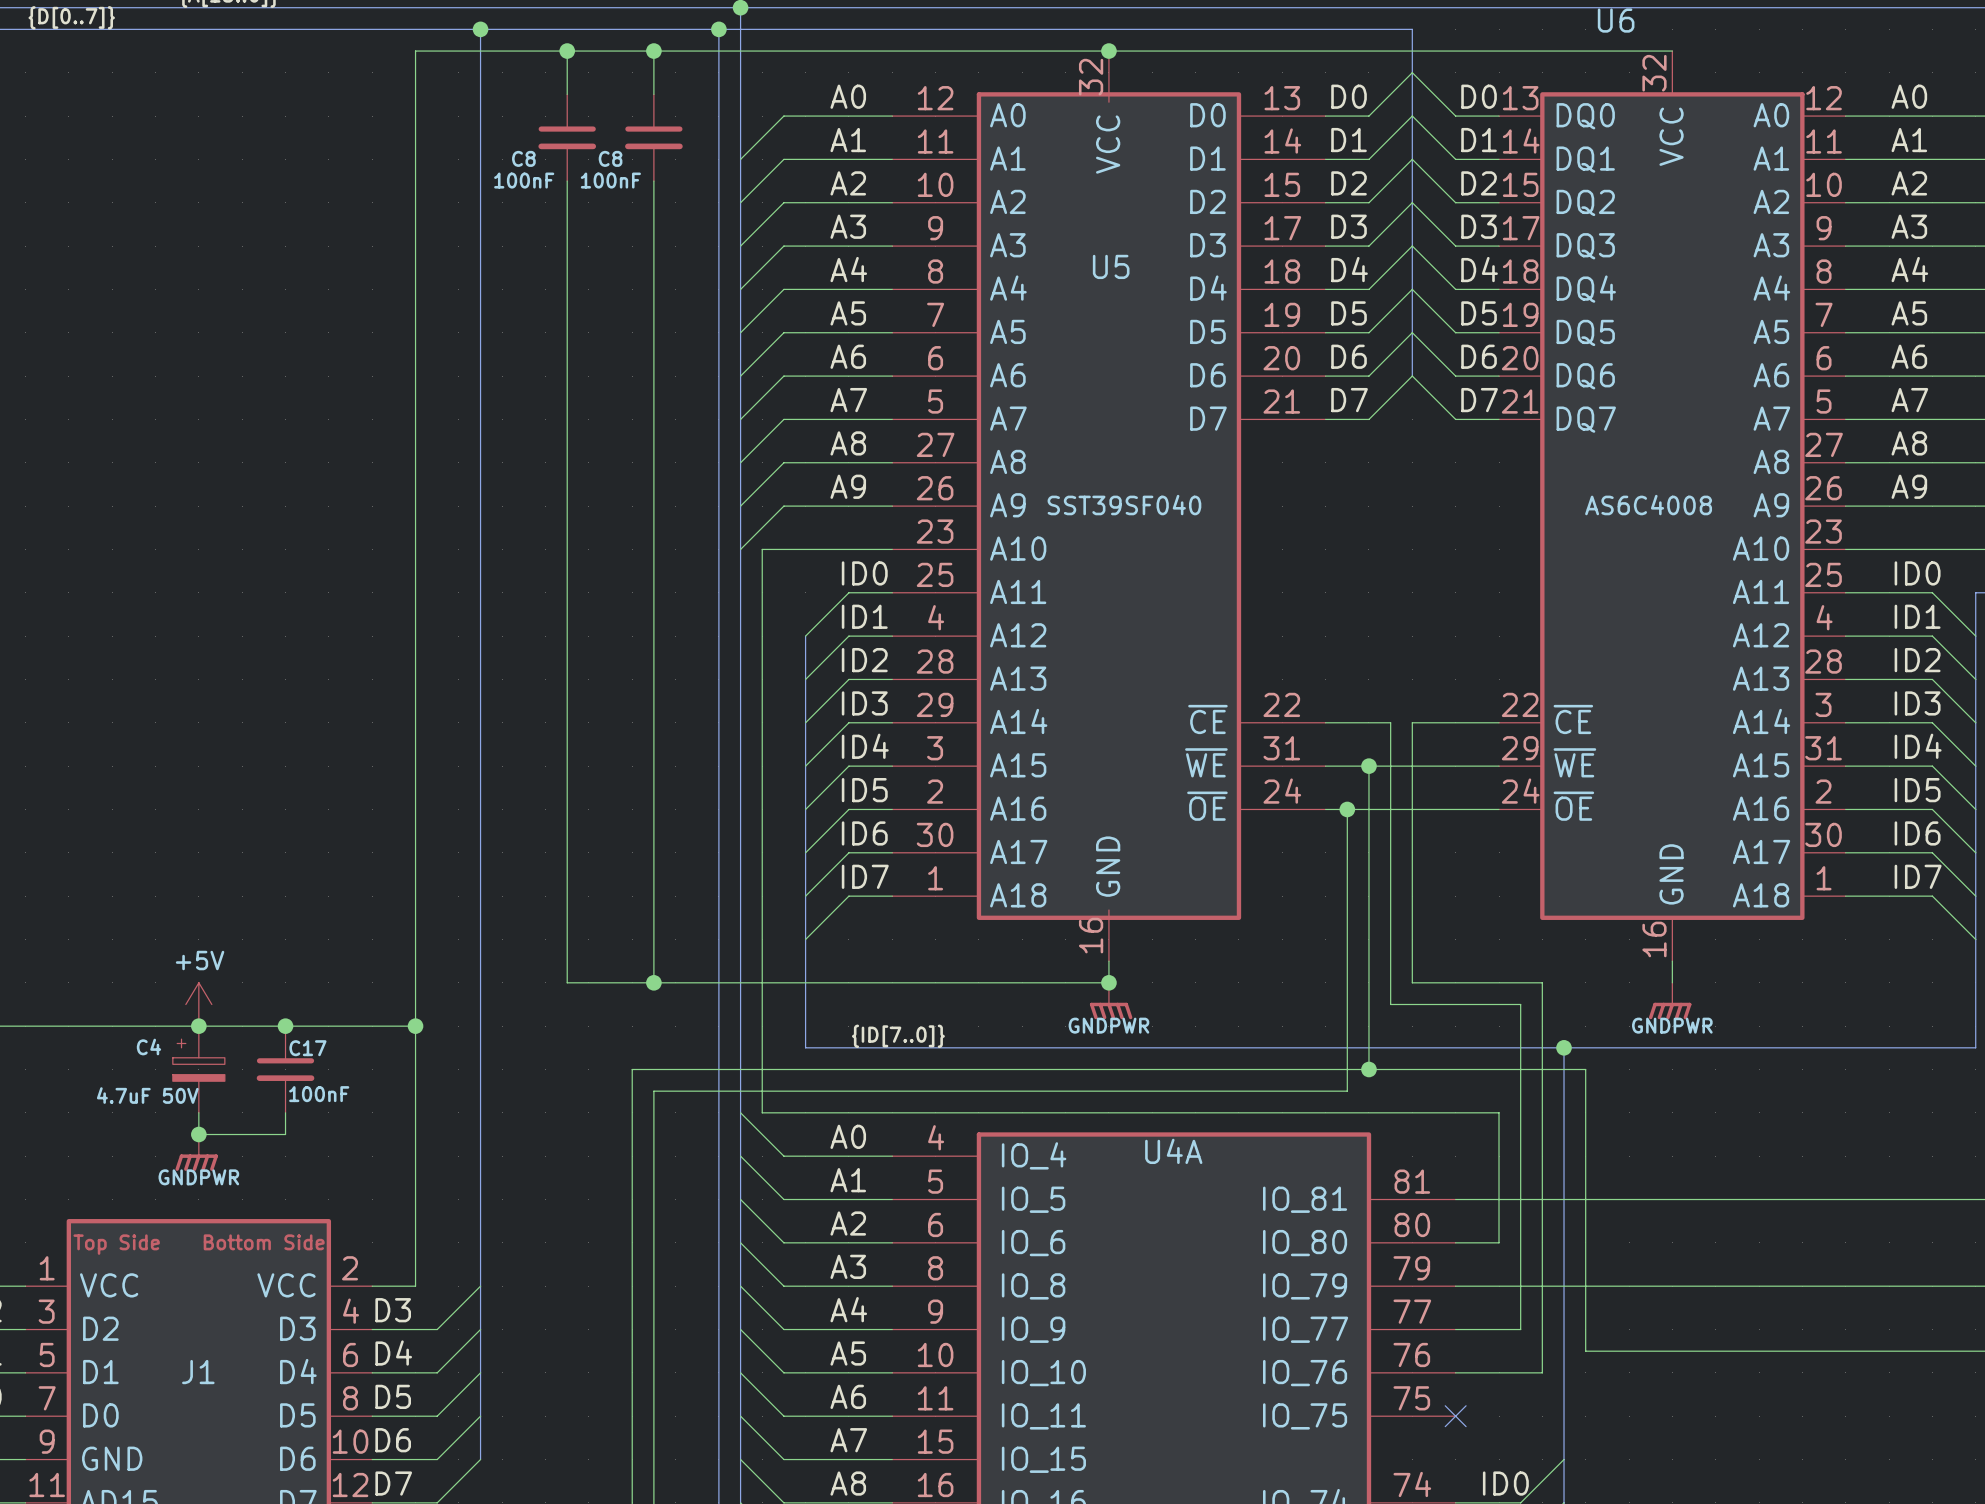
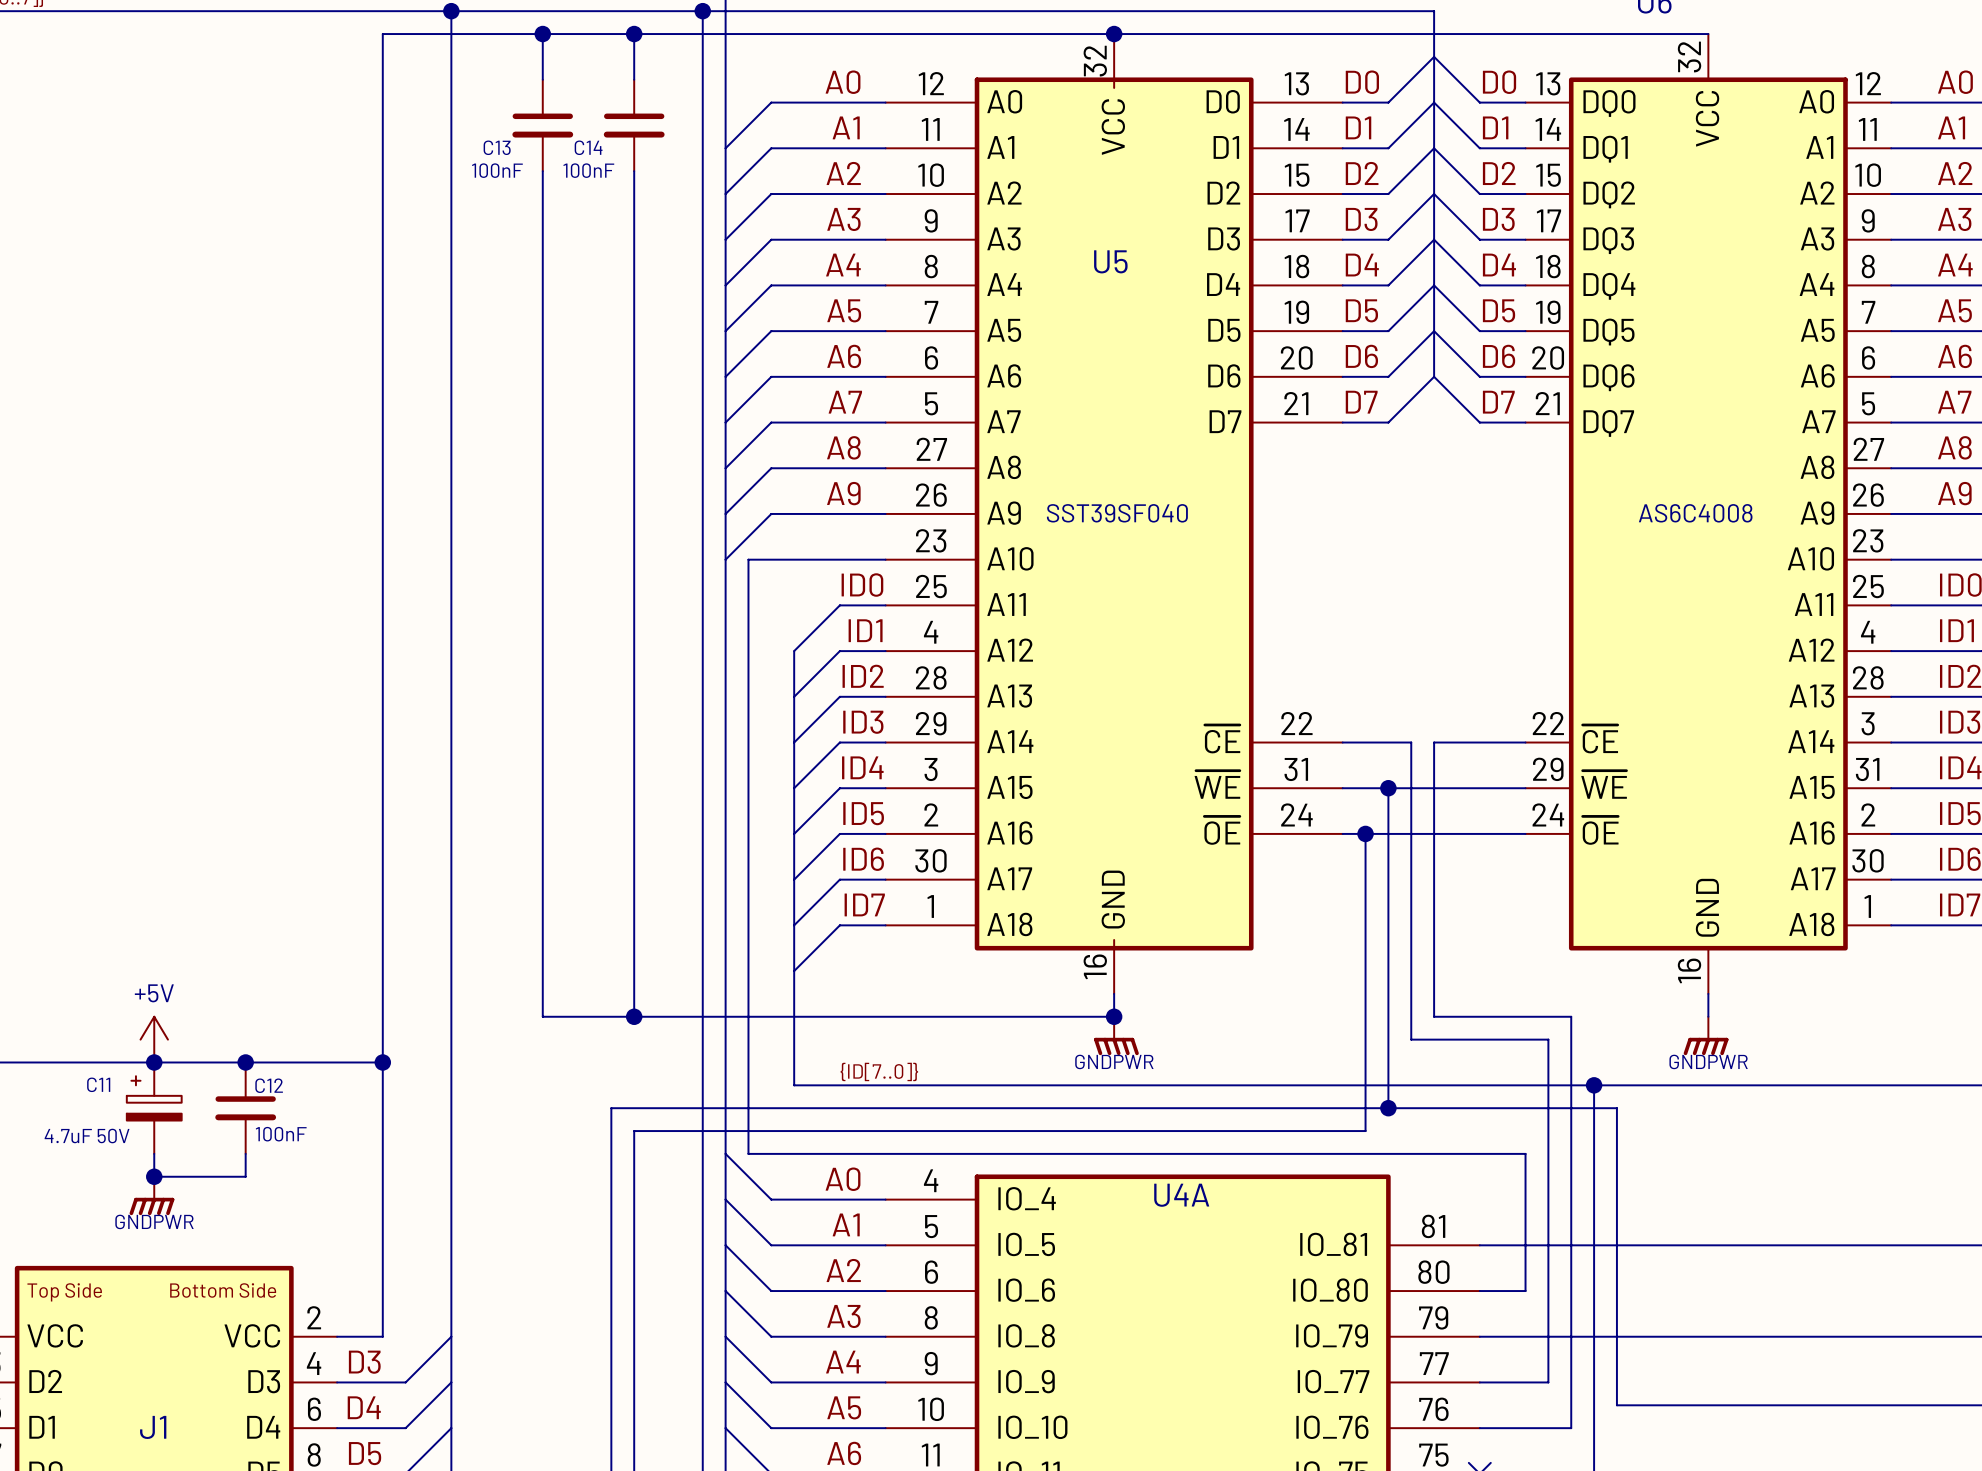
C8 name: C8 (523, 158) -> C13 (497, 147)
C8 name: C8 (610, 158) -> C14 (588, 147)
C4 name: C4 (148, 1047) -> C11 (98, 1084)
C17 name: C17 (307, 1048) -> C12 (269, 1085)

